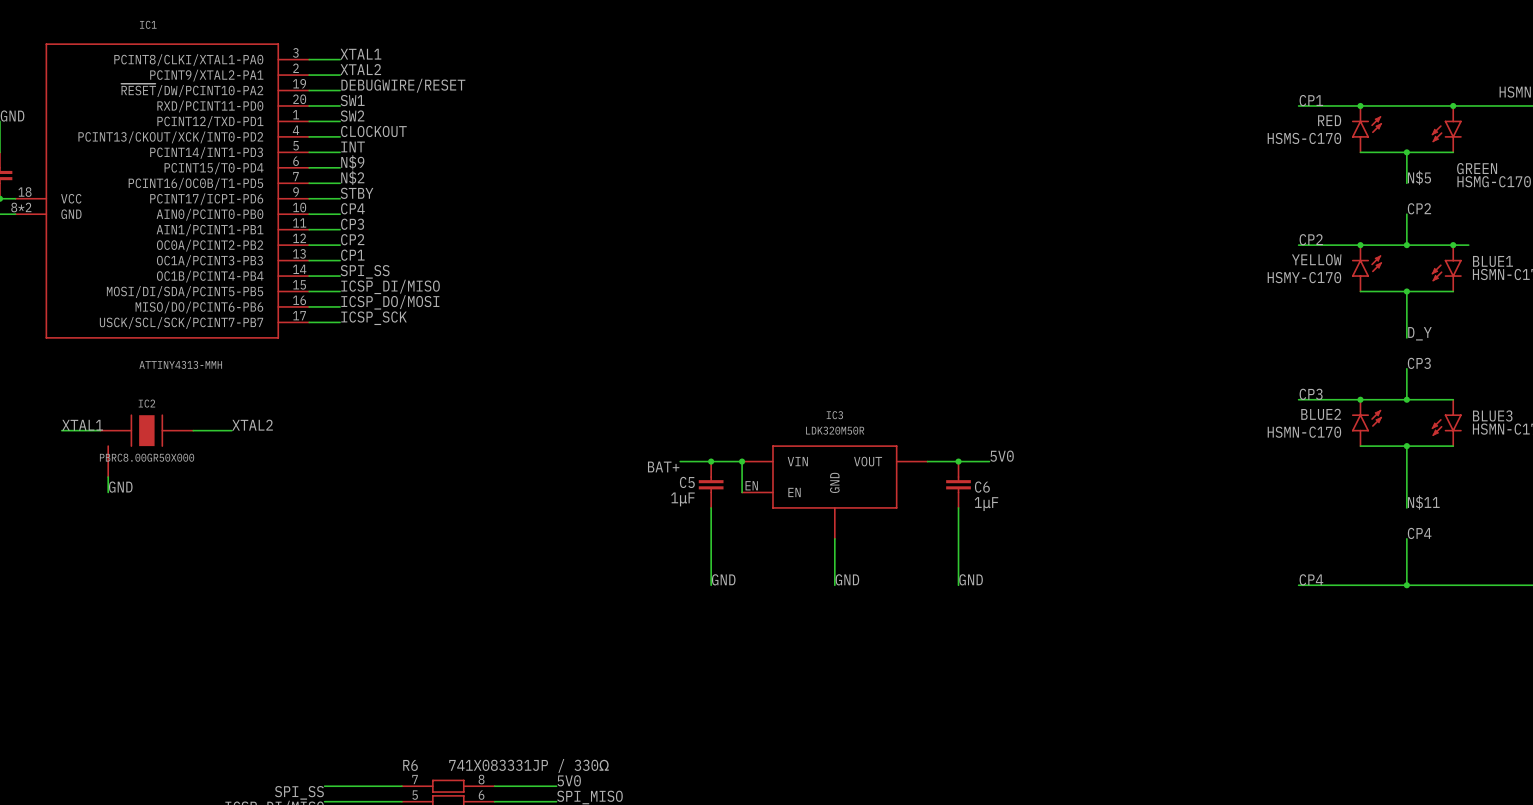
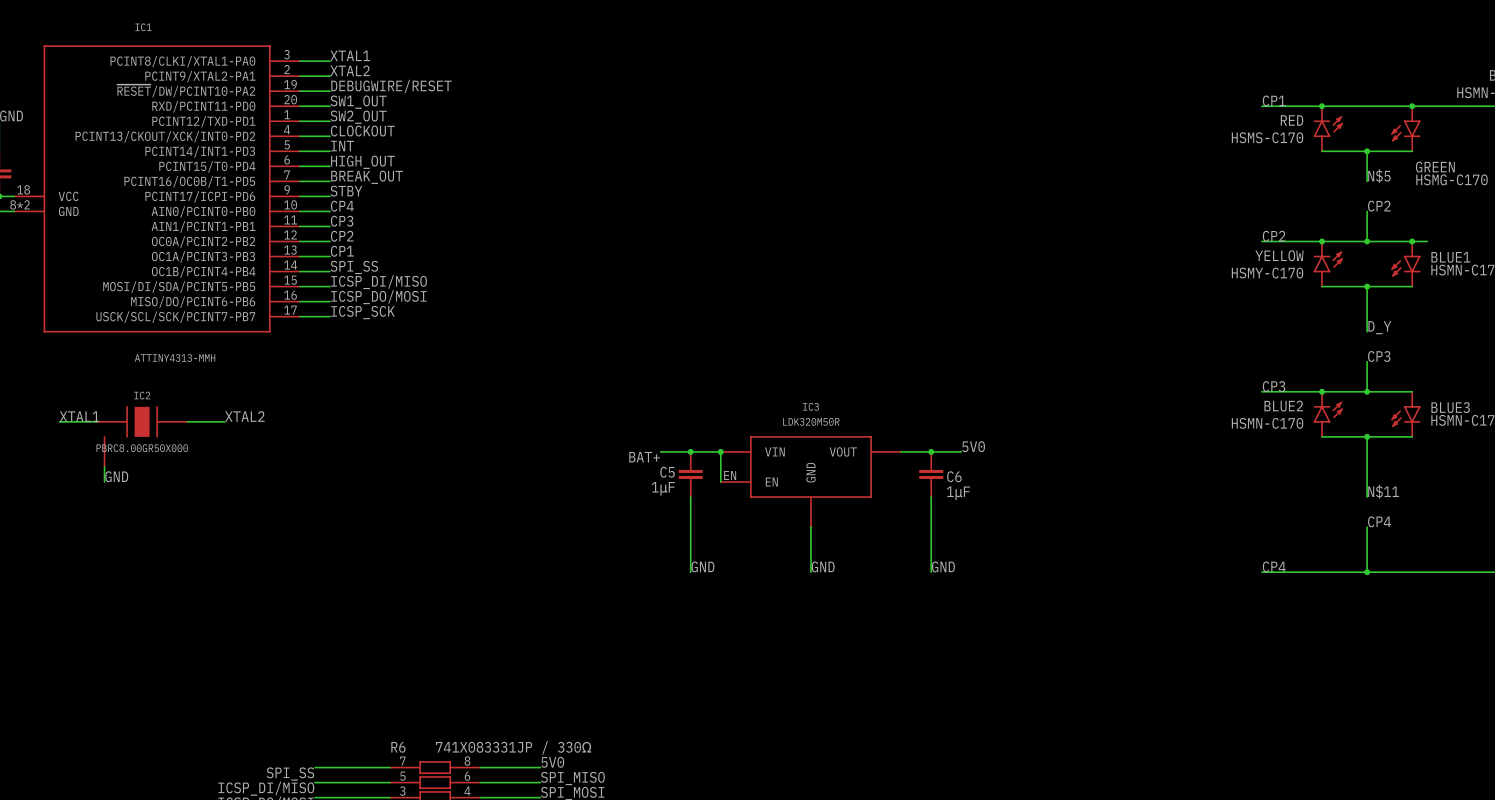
label: SW1 (352, 100) -> SW1_OUT (358, 102)
label: SW2 (352, 116) -> SW2_OUT (358, 117)
label: N$9 (352, 162) -> HIGH_OUT (362, 162)
label: N$2 (352, 177) -> BREAK_OUT (367, 177)

